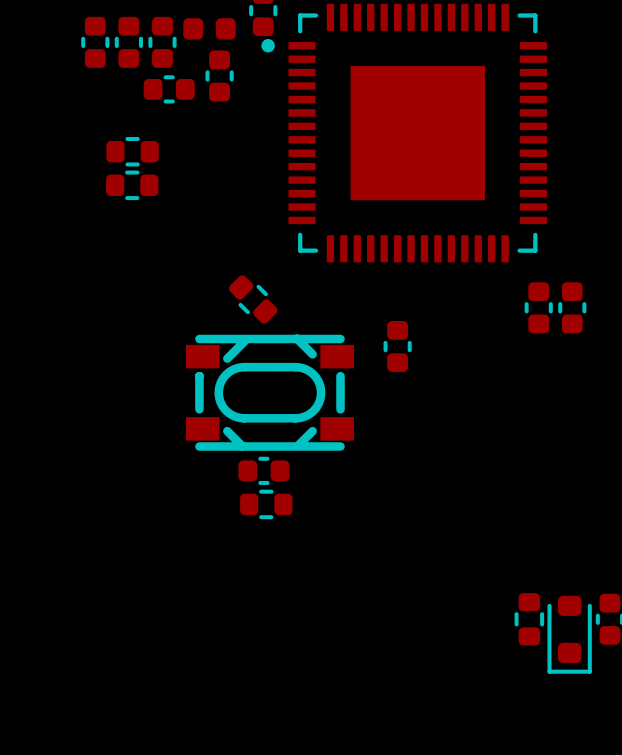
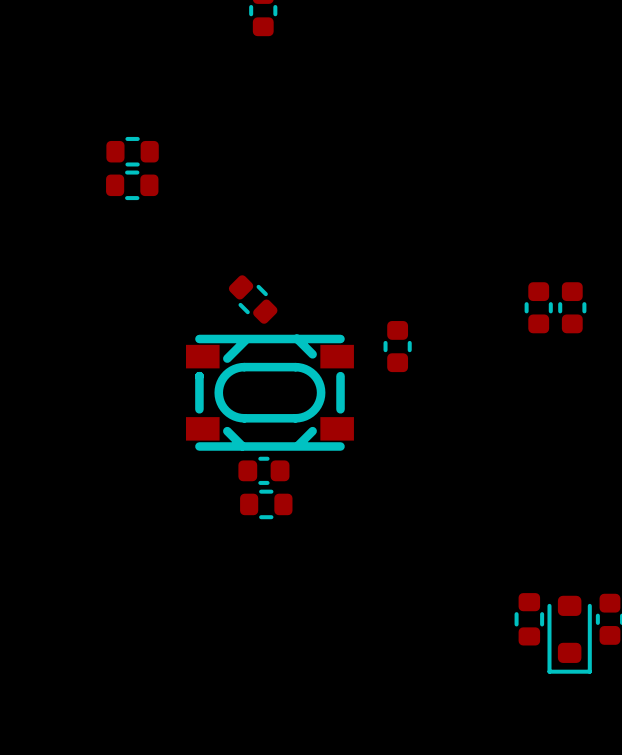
part: (209, 28) -> none
part: (95, 42) -> none
part: (128, 42) -> none
part: (162, 42) -> none
part: (219, 75) -> none
part: (169, 89) -> none
part: (404, 133) -> none

